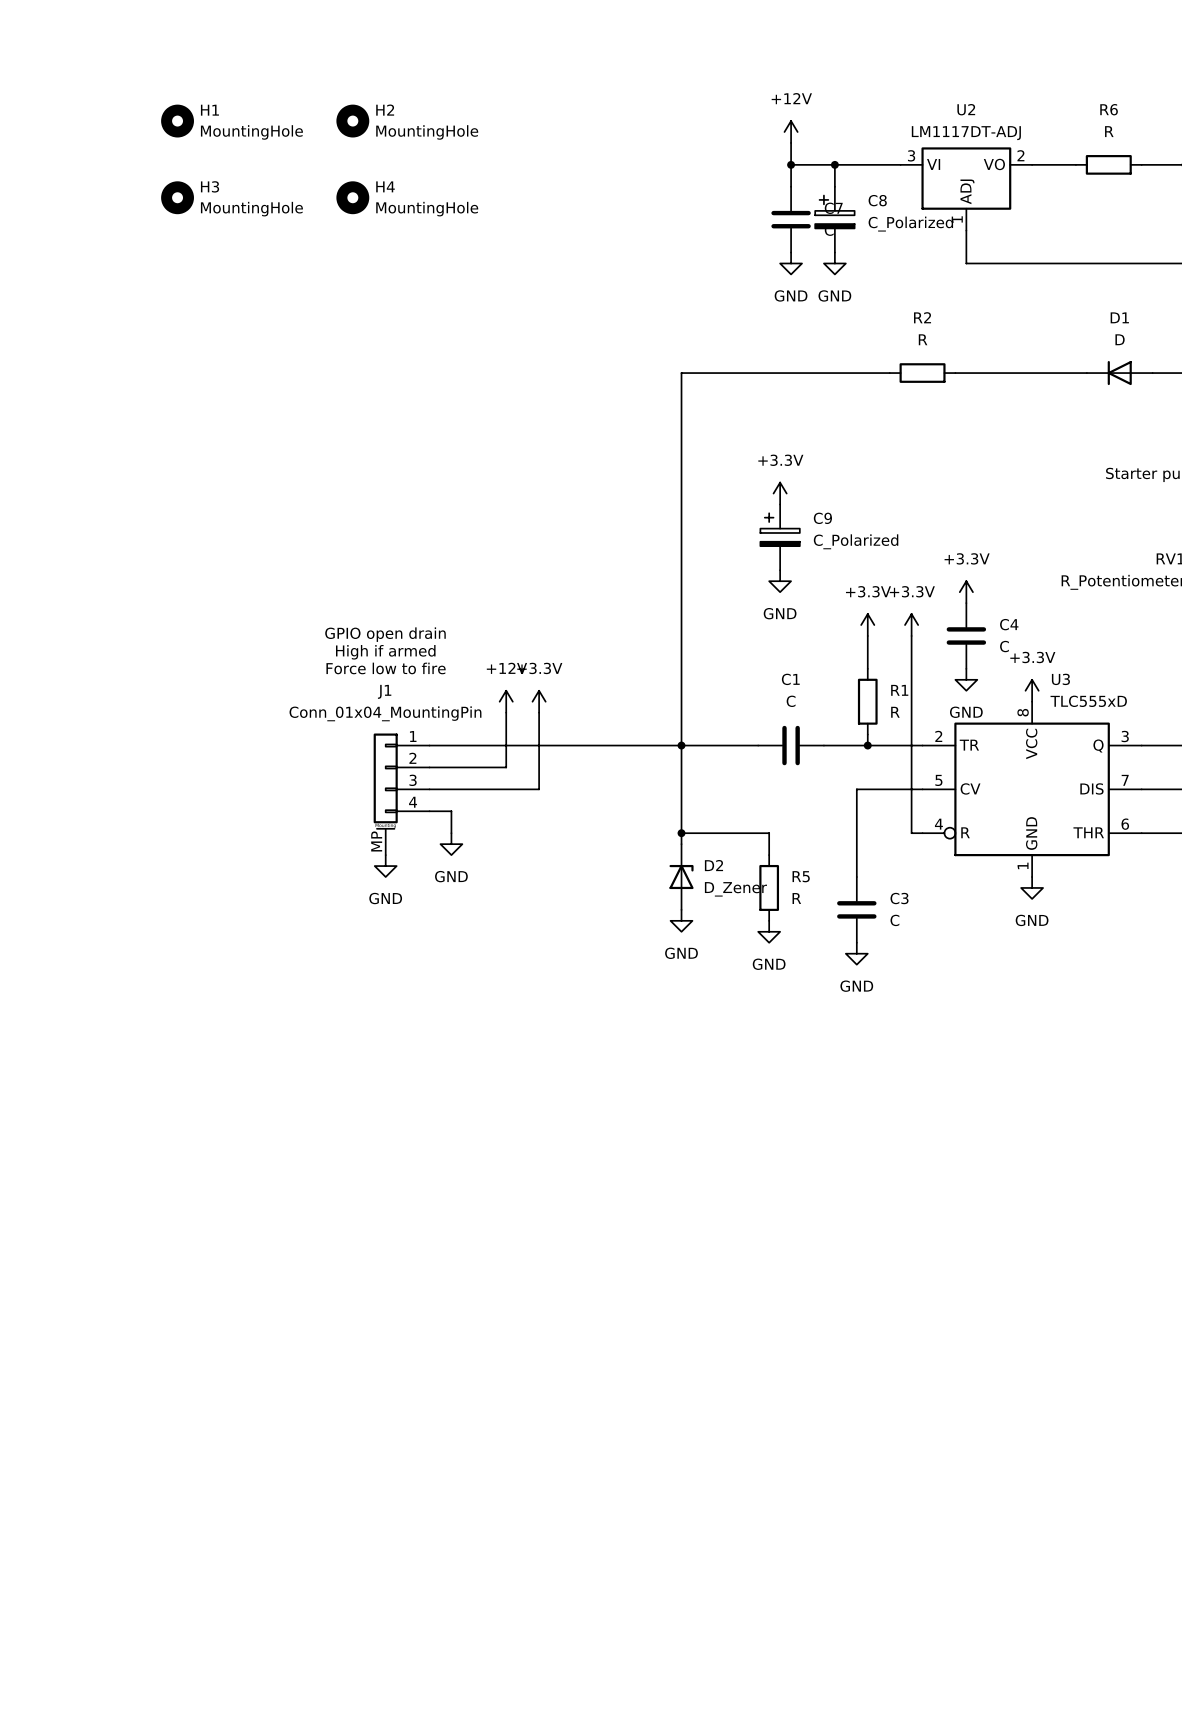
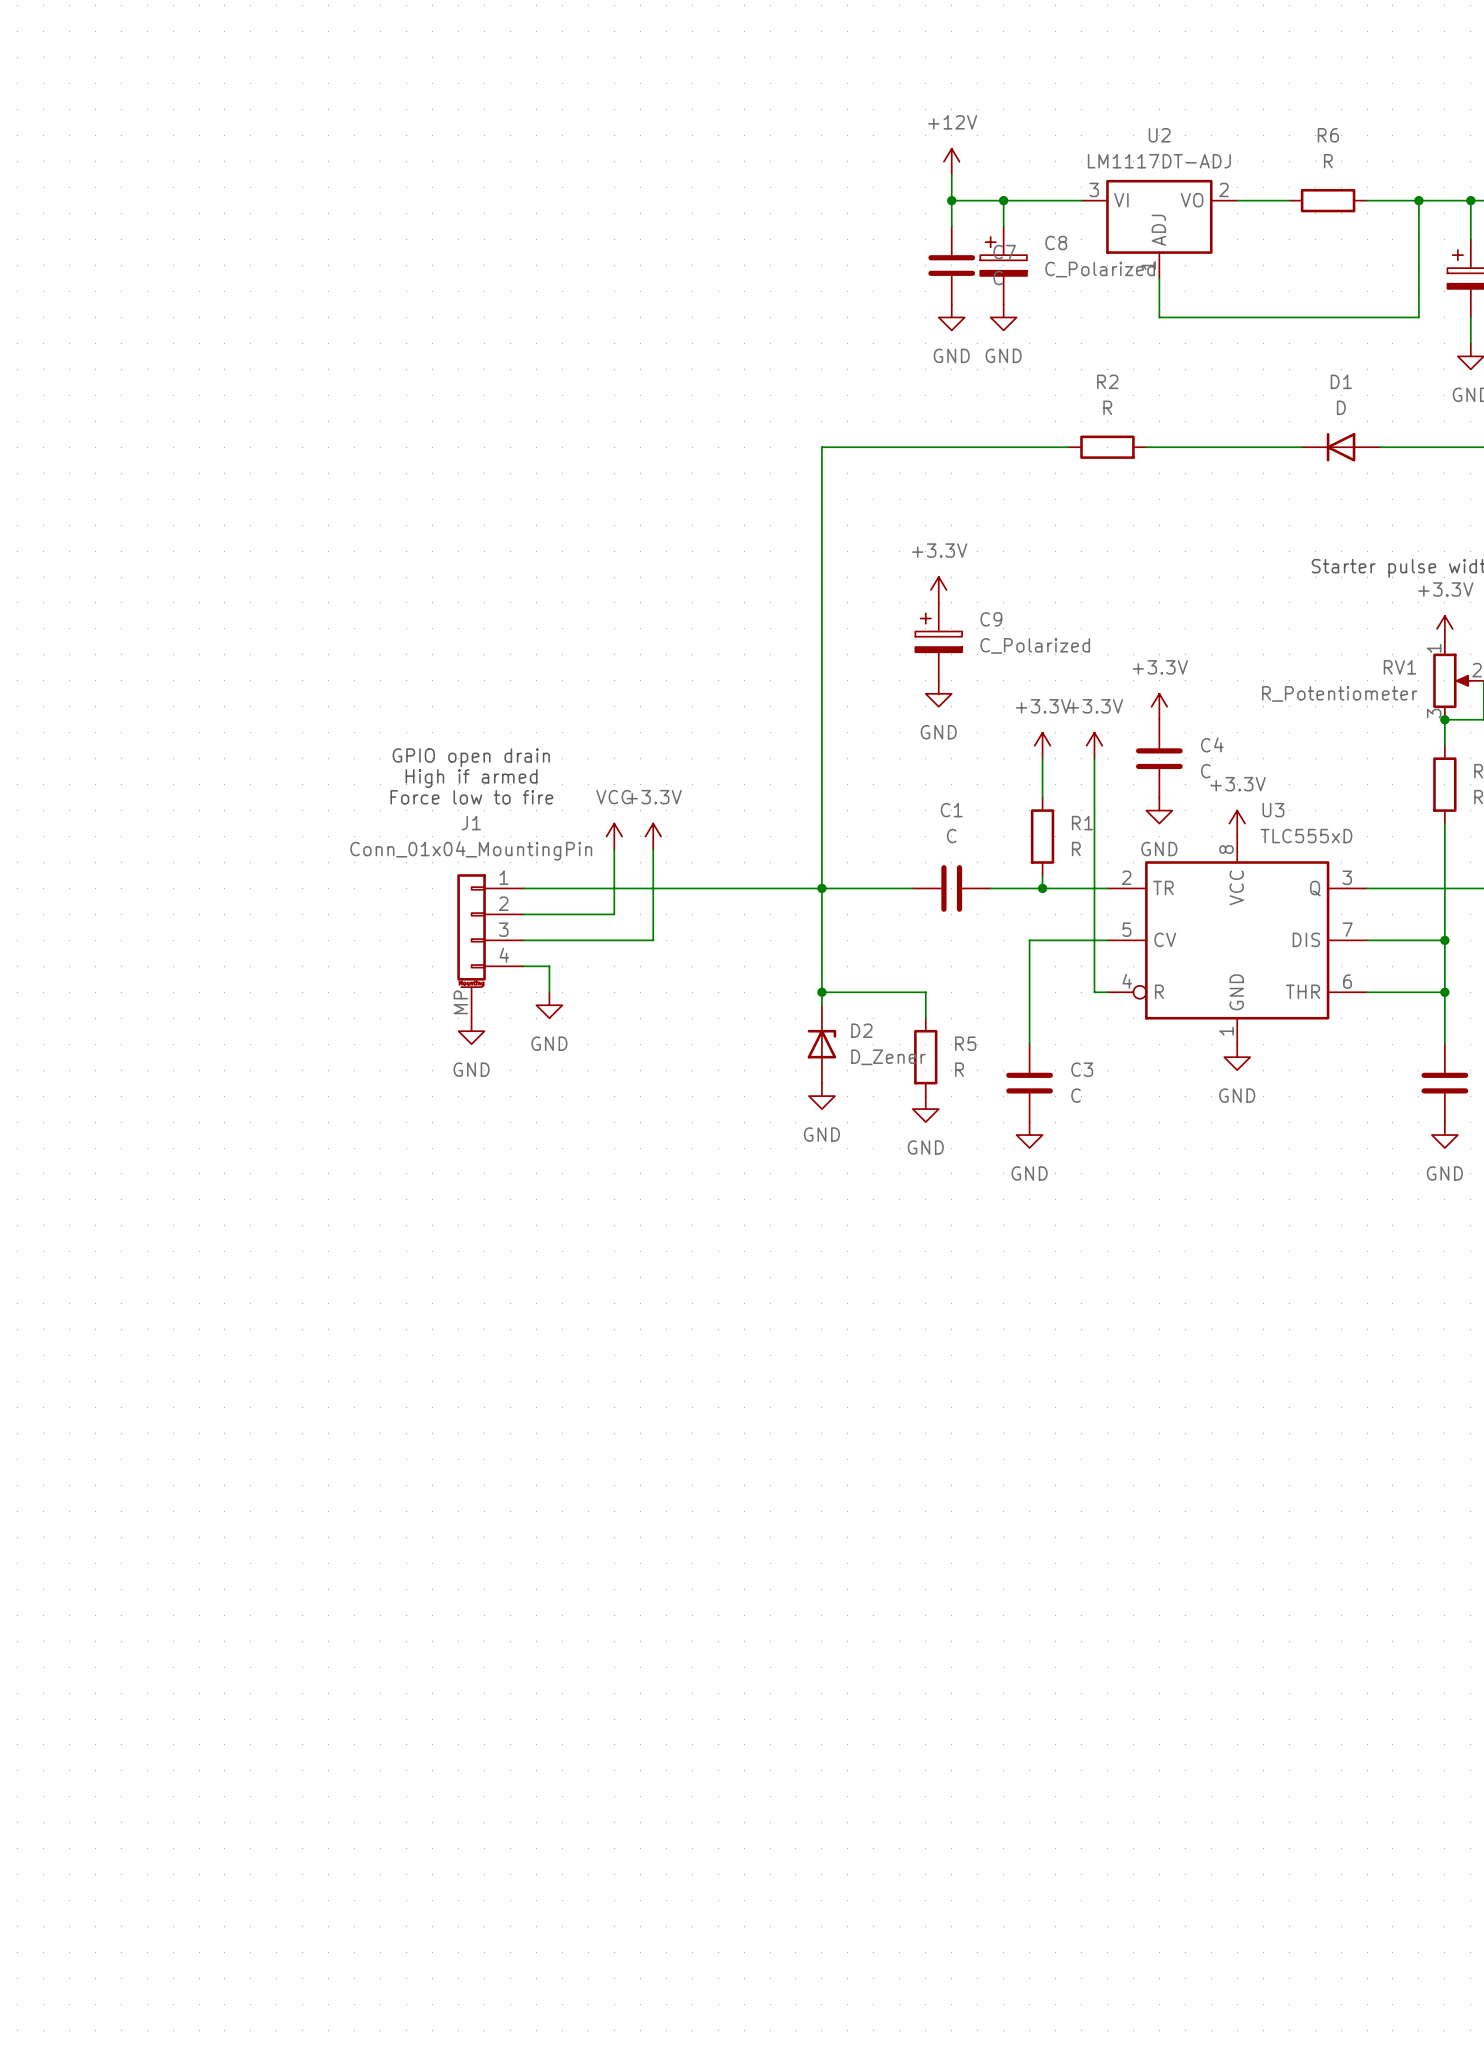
H1: MountingHole (177, 121) -> none
H2: MountingHole (352, 121) -> none
H3: MountingHole (177, 197) -> none
H4: MountingHole (352, 197) -> none
power symbol: +12V (506, 701) -> VCC (614, 836)

